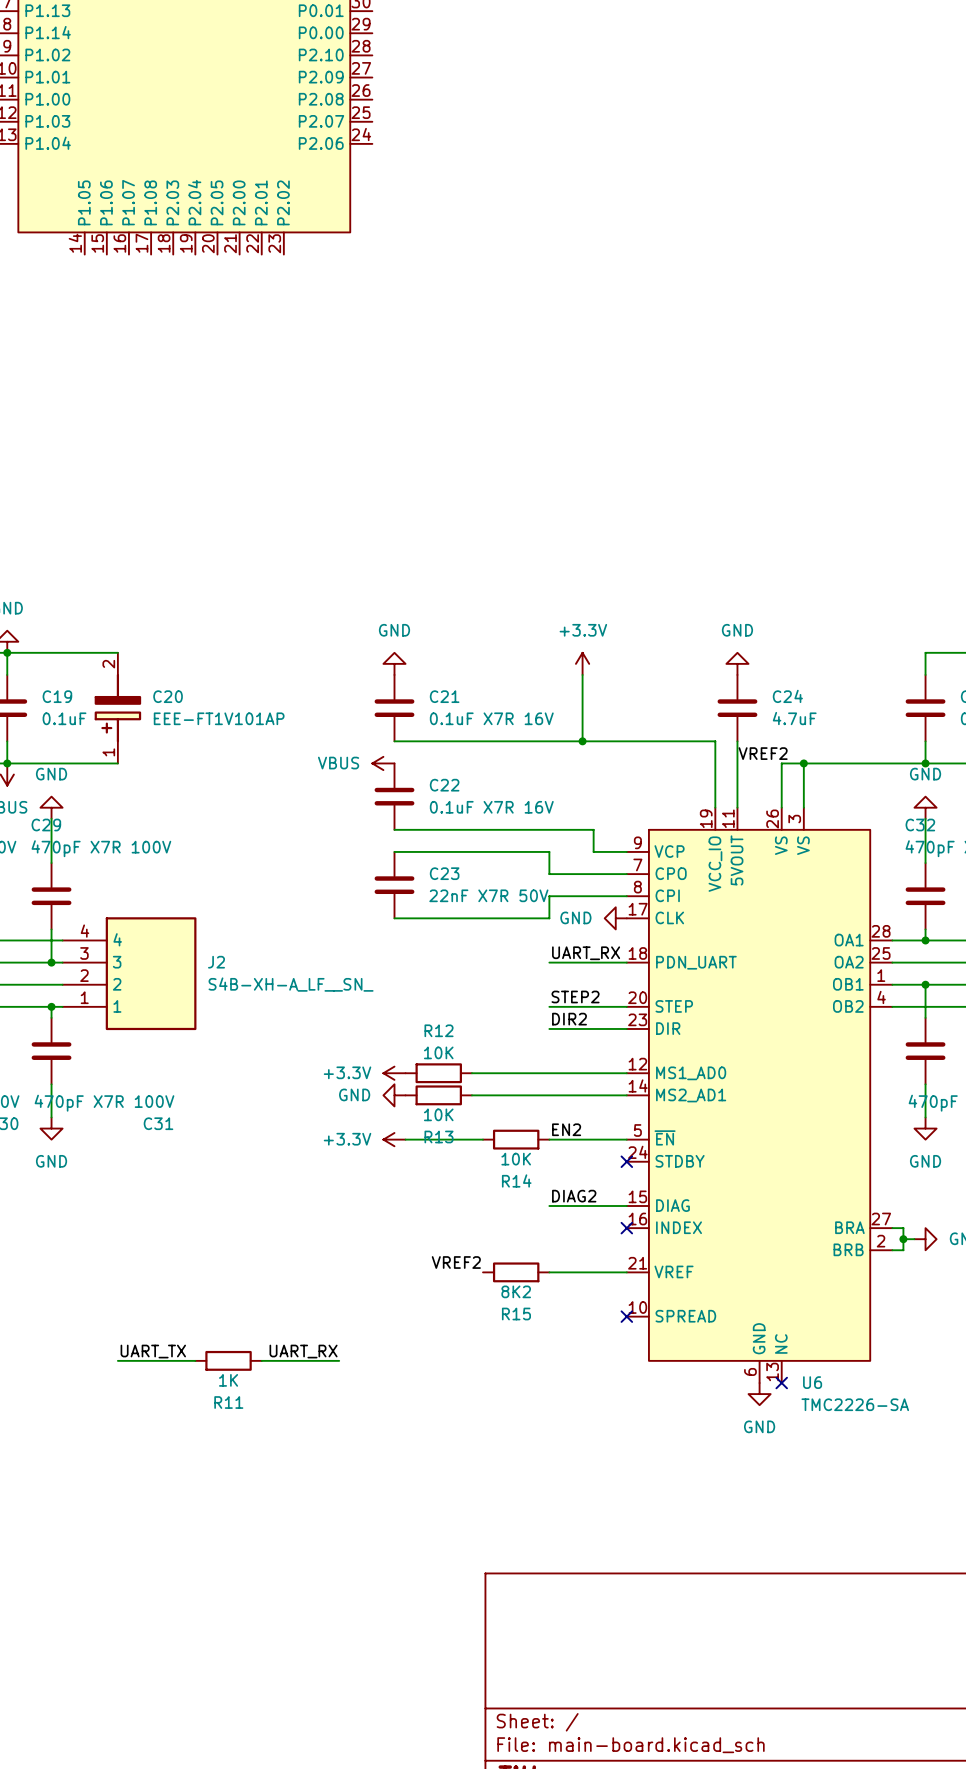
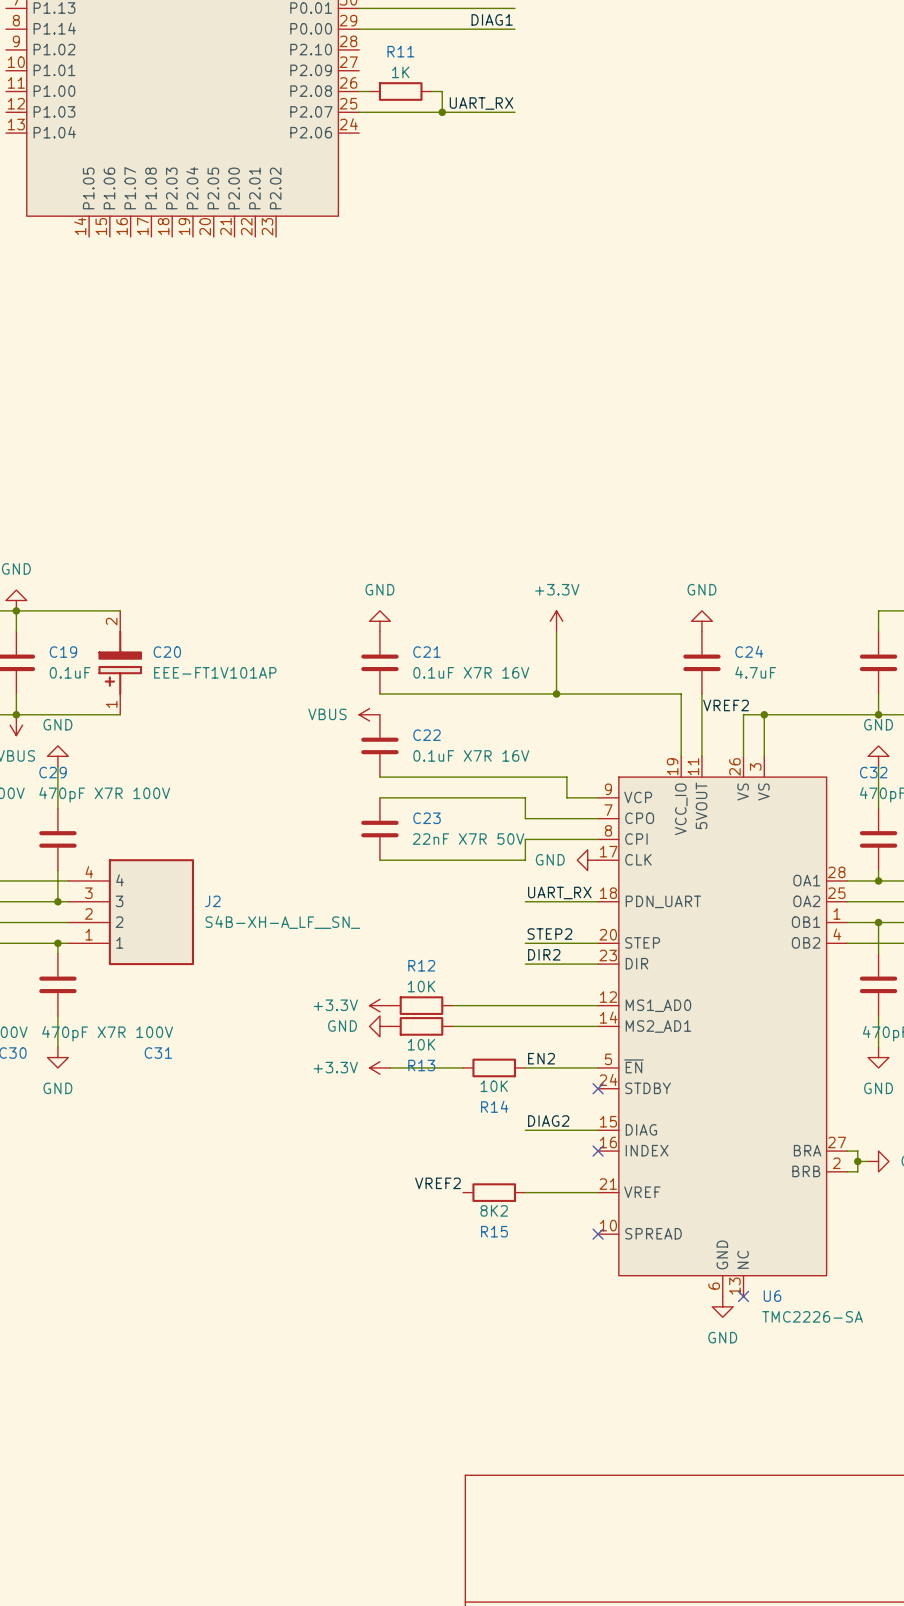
wire: none -> (359, 8) (514, 8)
label: none -> DIAG1 (492, 19)
wire: none -> (359, 29) (514, 29)
wire: none -> (359, 91) (369, 91)
wire: none -> (431, 91) (442, 91) (442, 112)
label: none -> UART_RX (481, 103)
wire: none -> (359, 112) (514, 112)
junction: none -> (442, 112)
label: UART_TX (153, 1351) -> none
label: UART_RX (303, 1351) -> none
wire: (117, 1360) (195, 1360) -> none
R11 position: (228, 1360) -> (400, 91)
wire: (261, 1360) (339, 1360) -> none
R11 value position: 1K (228, 1380) -> 1K (400, 72)
R11 name position: R11 (228, 1402) -> R11 (400, 51)

